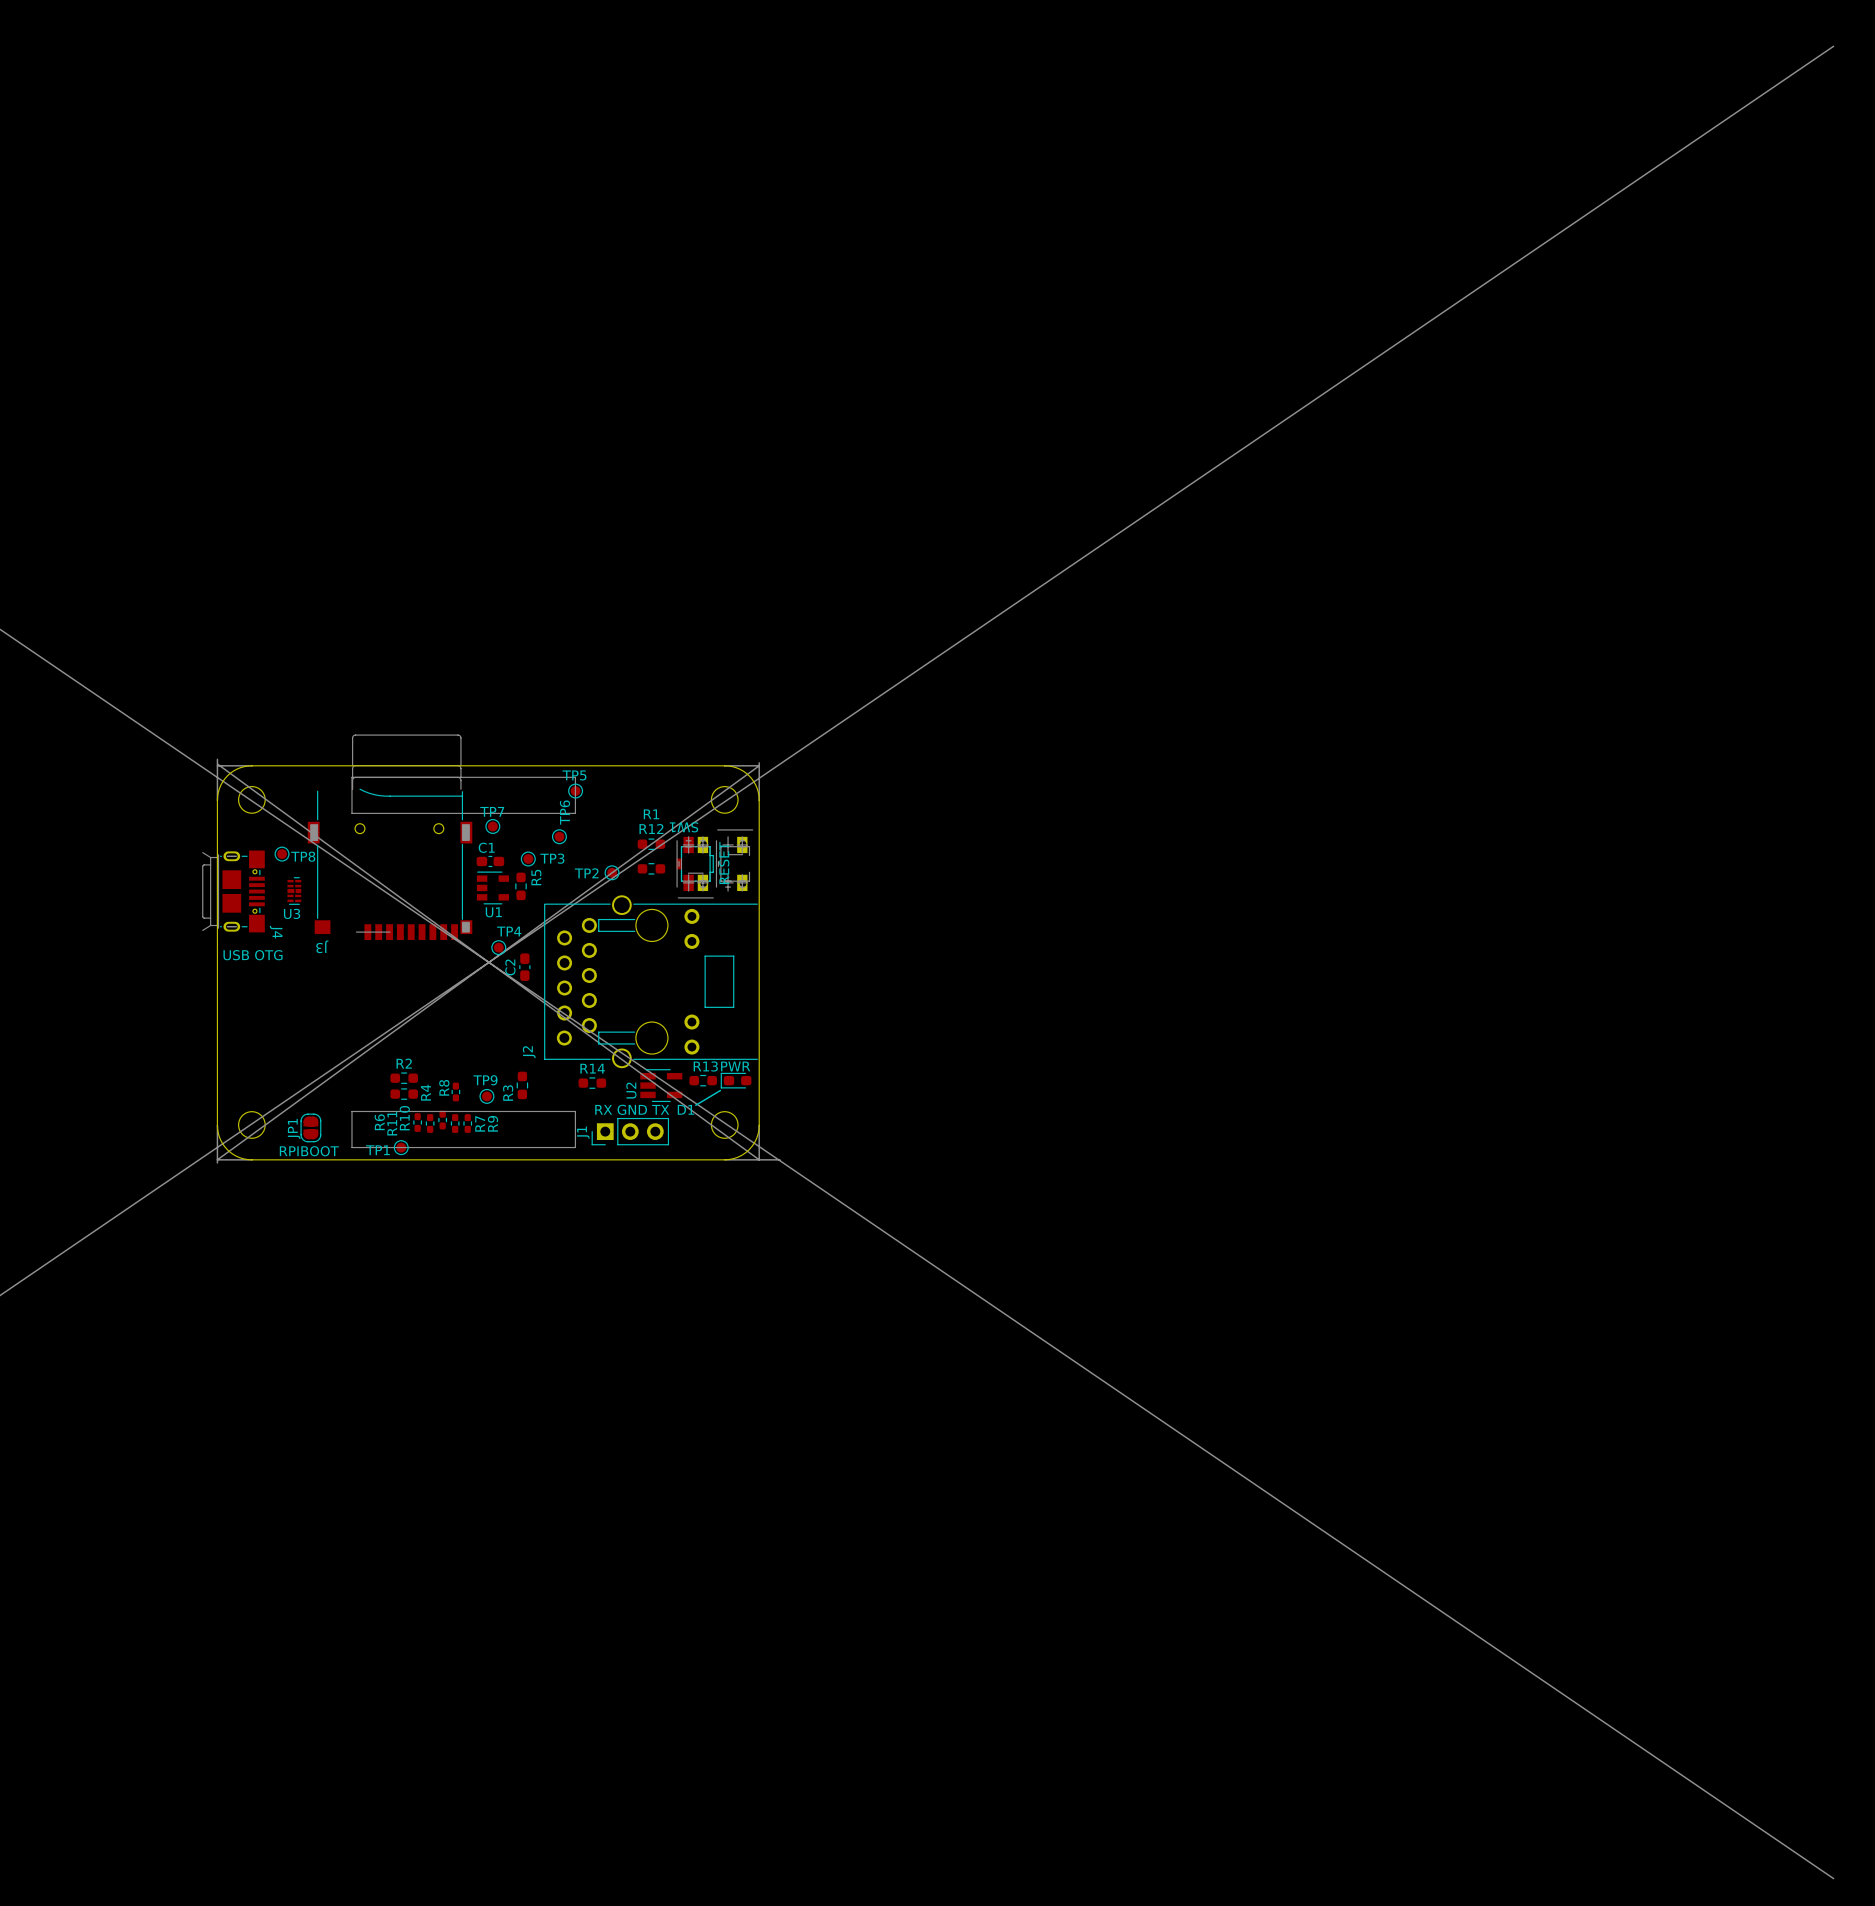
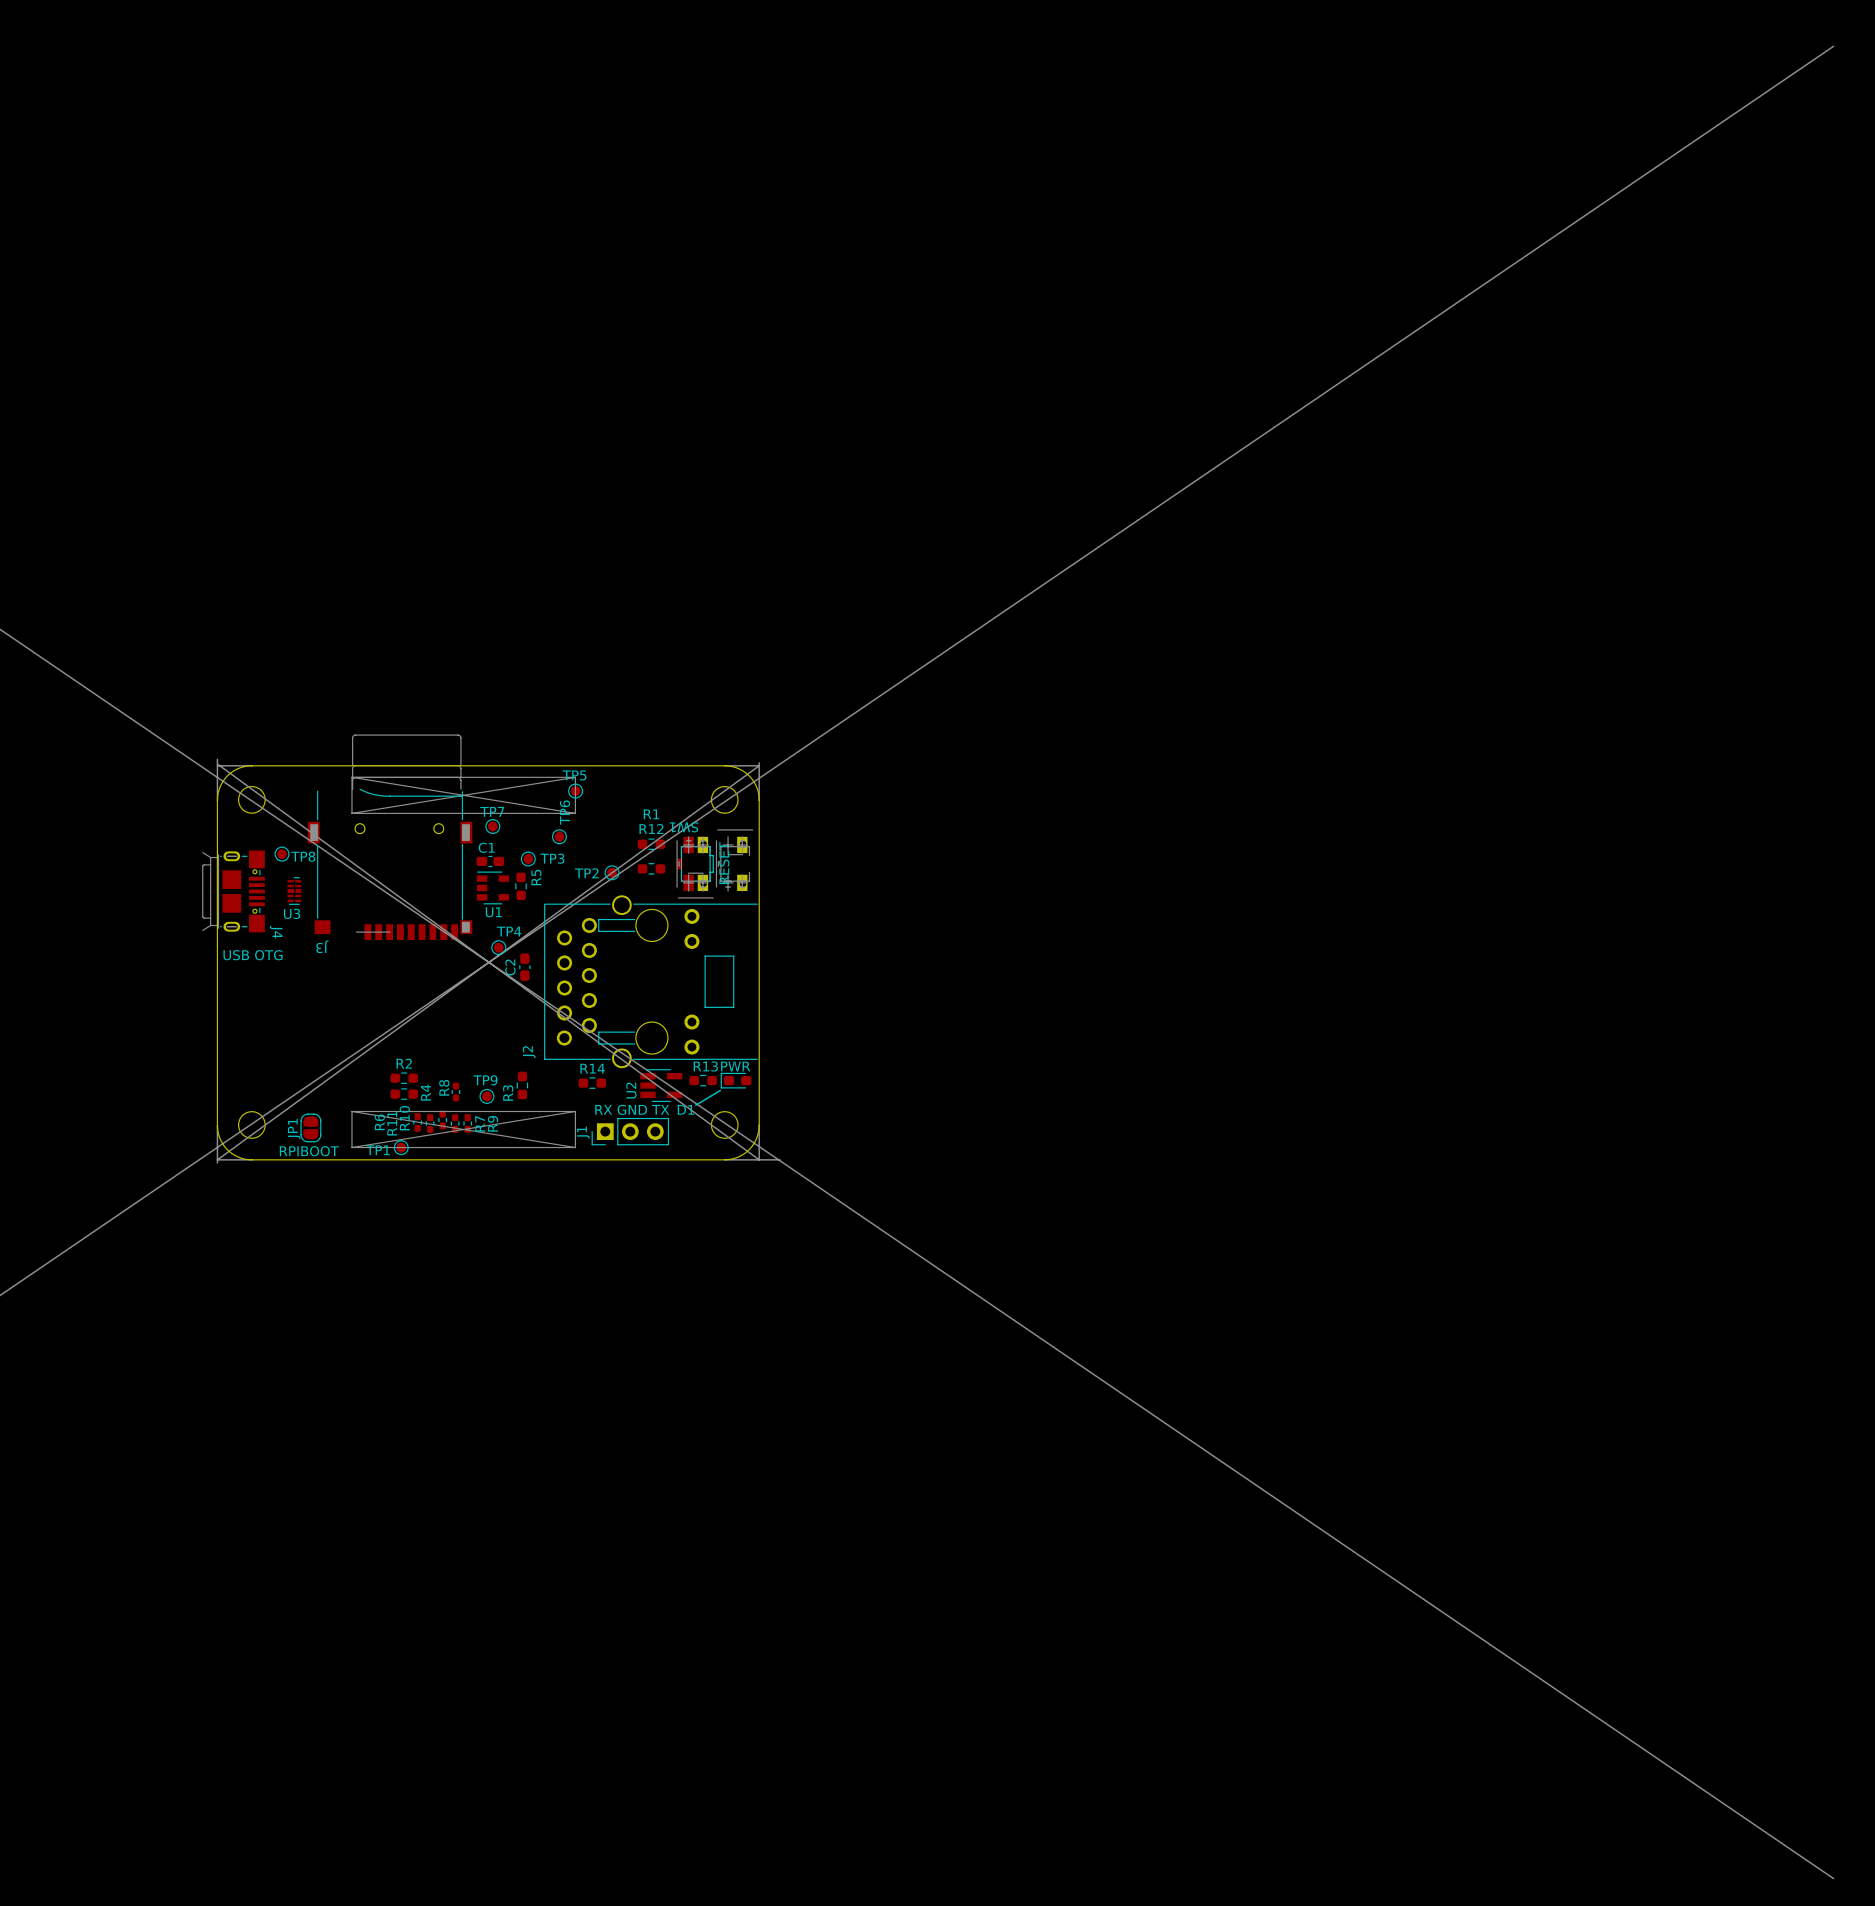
line: none -> (351, 777) (575, 813)
line: none -> (575, 777) (351, 813)
line: none -> (351, 1111) (575, 1147)
line: none -> (575, 1111) (351, 1147)

